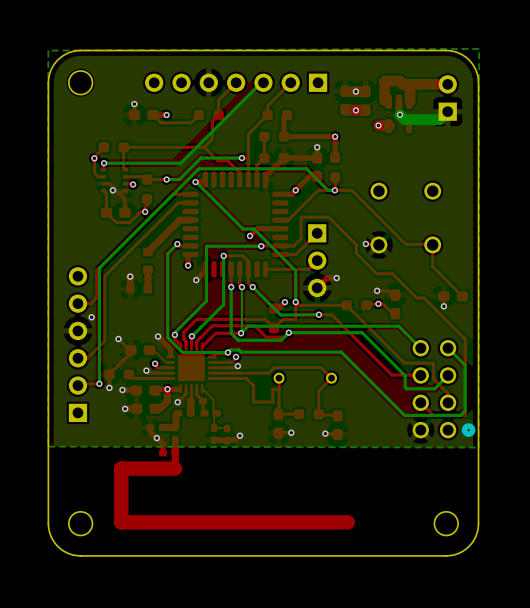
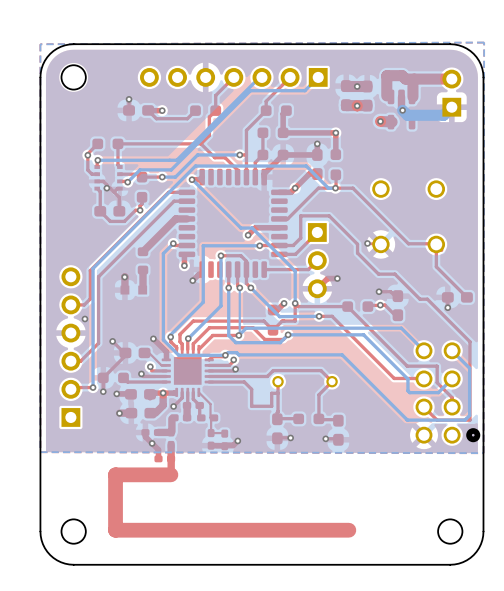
bottom track: none -> (318, 77) (304, 90) (250, 90) (171, 169) (140, 169) (127, 182)

